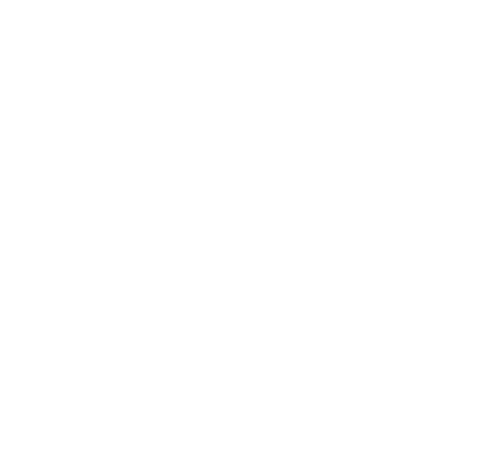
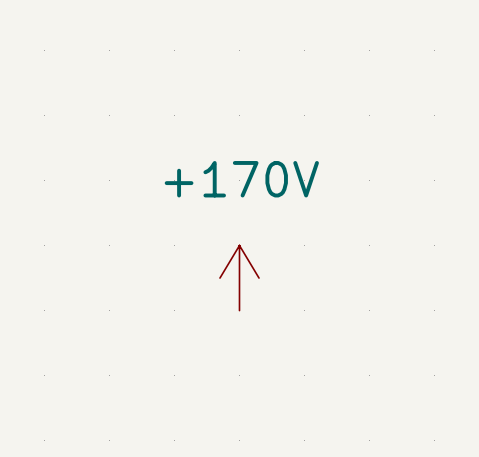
power symbol: none -> +170V (239, 278)

